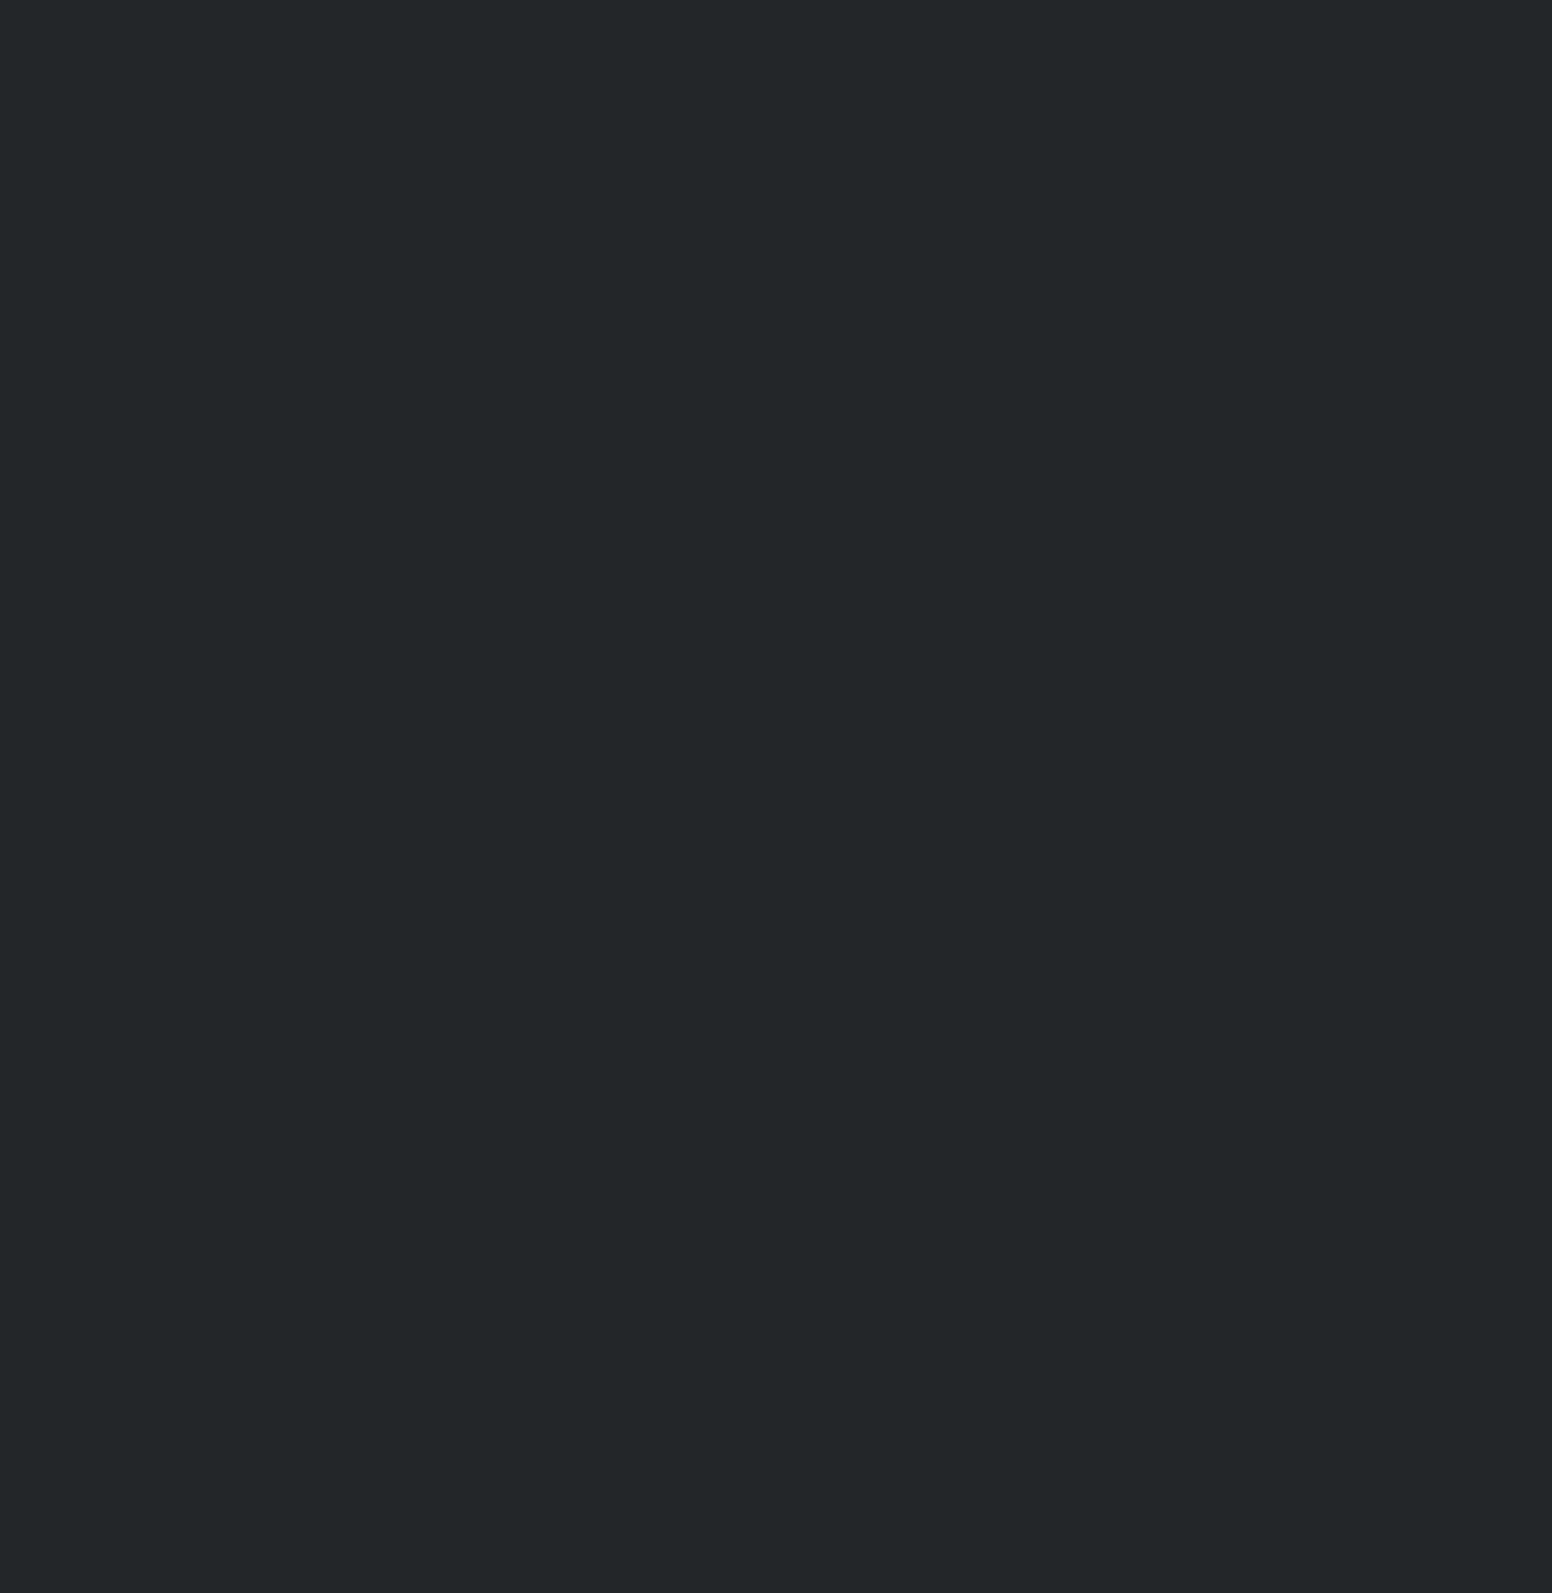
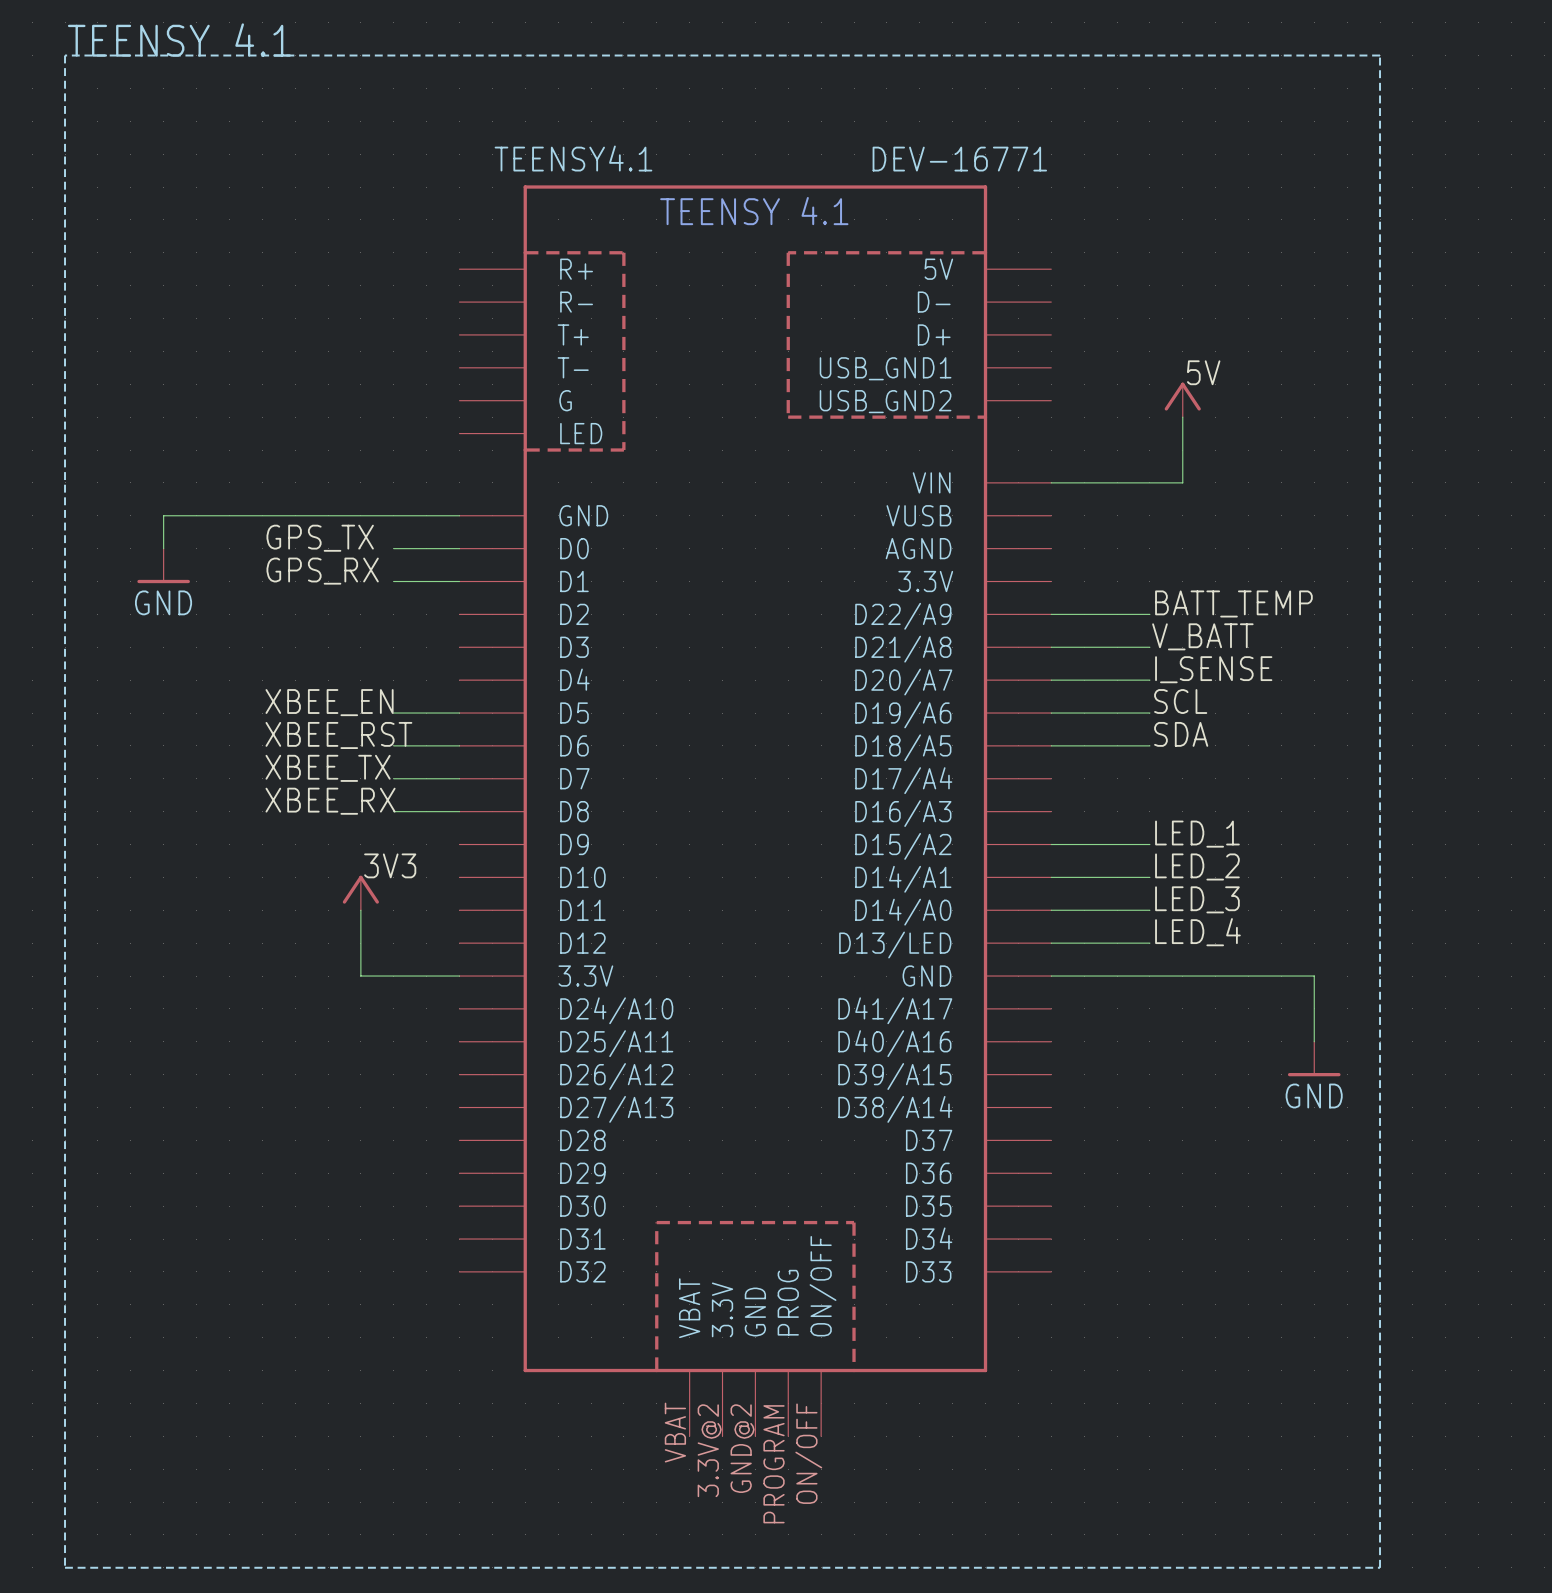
text: none -> TEENSY 4.1 (179, 40)
line: none -> (65, 55) (65, 1567) (1380, 1567) (1380, 55) (65, 55)
label: none -> 5V (1203, 372)
power symbol: none -> (1182, 399)
wire: none -> (1182, 417) (1182, 482) (1051, 482)
wire: none -> (459, 515) (163, 515) (163, 548)
label: none -> GPS_TX (320, 538)
wire: none -> (393, 548) (459, 548)
power symbol: none -> GND (163, 565)
label: none -> GPS_RX (322, 571)
wire: none -> (393, 581) (459, 581)
label: none -> BATT_TEMP (1233, 603)
wire: none -> (1051, 614) (1149, 614)
label: none -> V_BATT (1202, 636)
wire: none -> (1051, 647) (1149, 647)
label: none -> I_SENSE (1213, 669)
wire: none -> (1051, 680) (1149, 680)
label: none -> SCL (1180, 701)
label: none -> XBEE_EN (329, 702)
wire: none -> (393, 713) (459, 713)
wire: none -> (1051, 713) (1149, 713)
label: none -> SDA (1181, 734)
label: none -> XBEE_RST (338, 735)
wire: none -> (393, 745) (459, 745)
wire: none -> (1051, 745) (1149, 745)
label: none -> XBEE_TX (328, 768)
wire: none -> (393, 778) (459, 778)
label: none -> XBEE_RX (330, 801)
TEENSY4.1: none -> DEV-16771 (755, 810)
wire: none -> (393, 811) (459, 811)
label: none -> LED_1 (1197, 834)
wire: none -> (1051, 844) (1149, 844)
label: none -> 3V3 (390, 865)
label: none -> LED_2 (1197, 866)
wire: none -> (1051, 877) (1149, 877)
power symbol: none -> (360, 893)
label: none -> LED_3 (1197, 899)
wire: none -> (360, 910) (360, 976) (459, 976)
wire: none -> (1051, 910) (1149, 910)
label: none -> LED_4 (1197, 932)
wire: none -> (1051, 943) (1149, 943)
wire: none -> (1051, 976) (1314, 976) (1314, 1041)
power symbol: none -> GND (1314, 1059)

